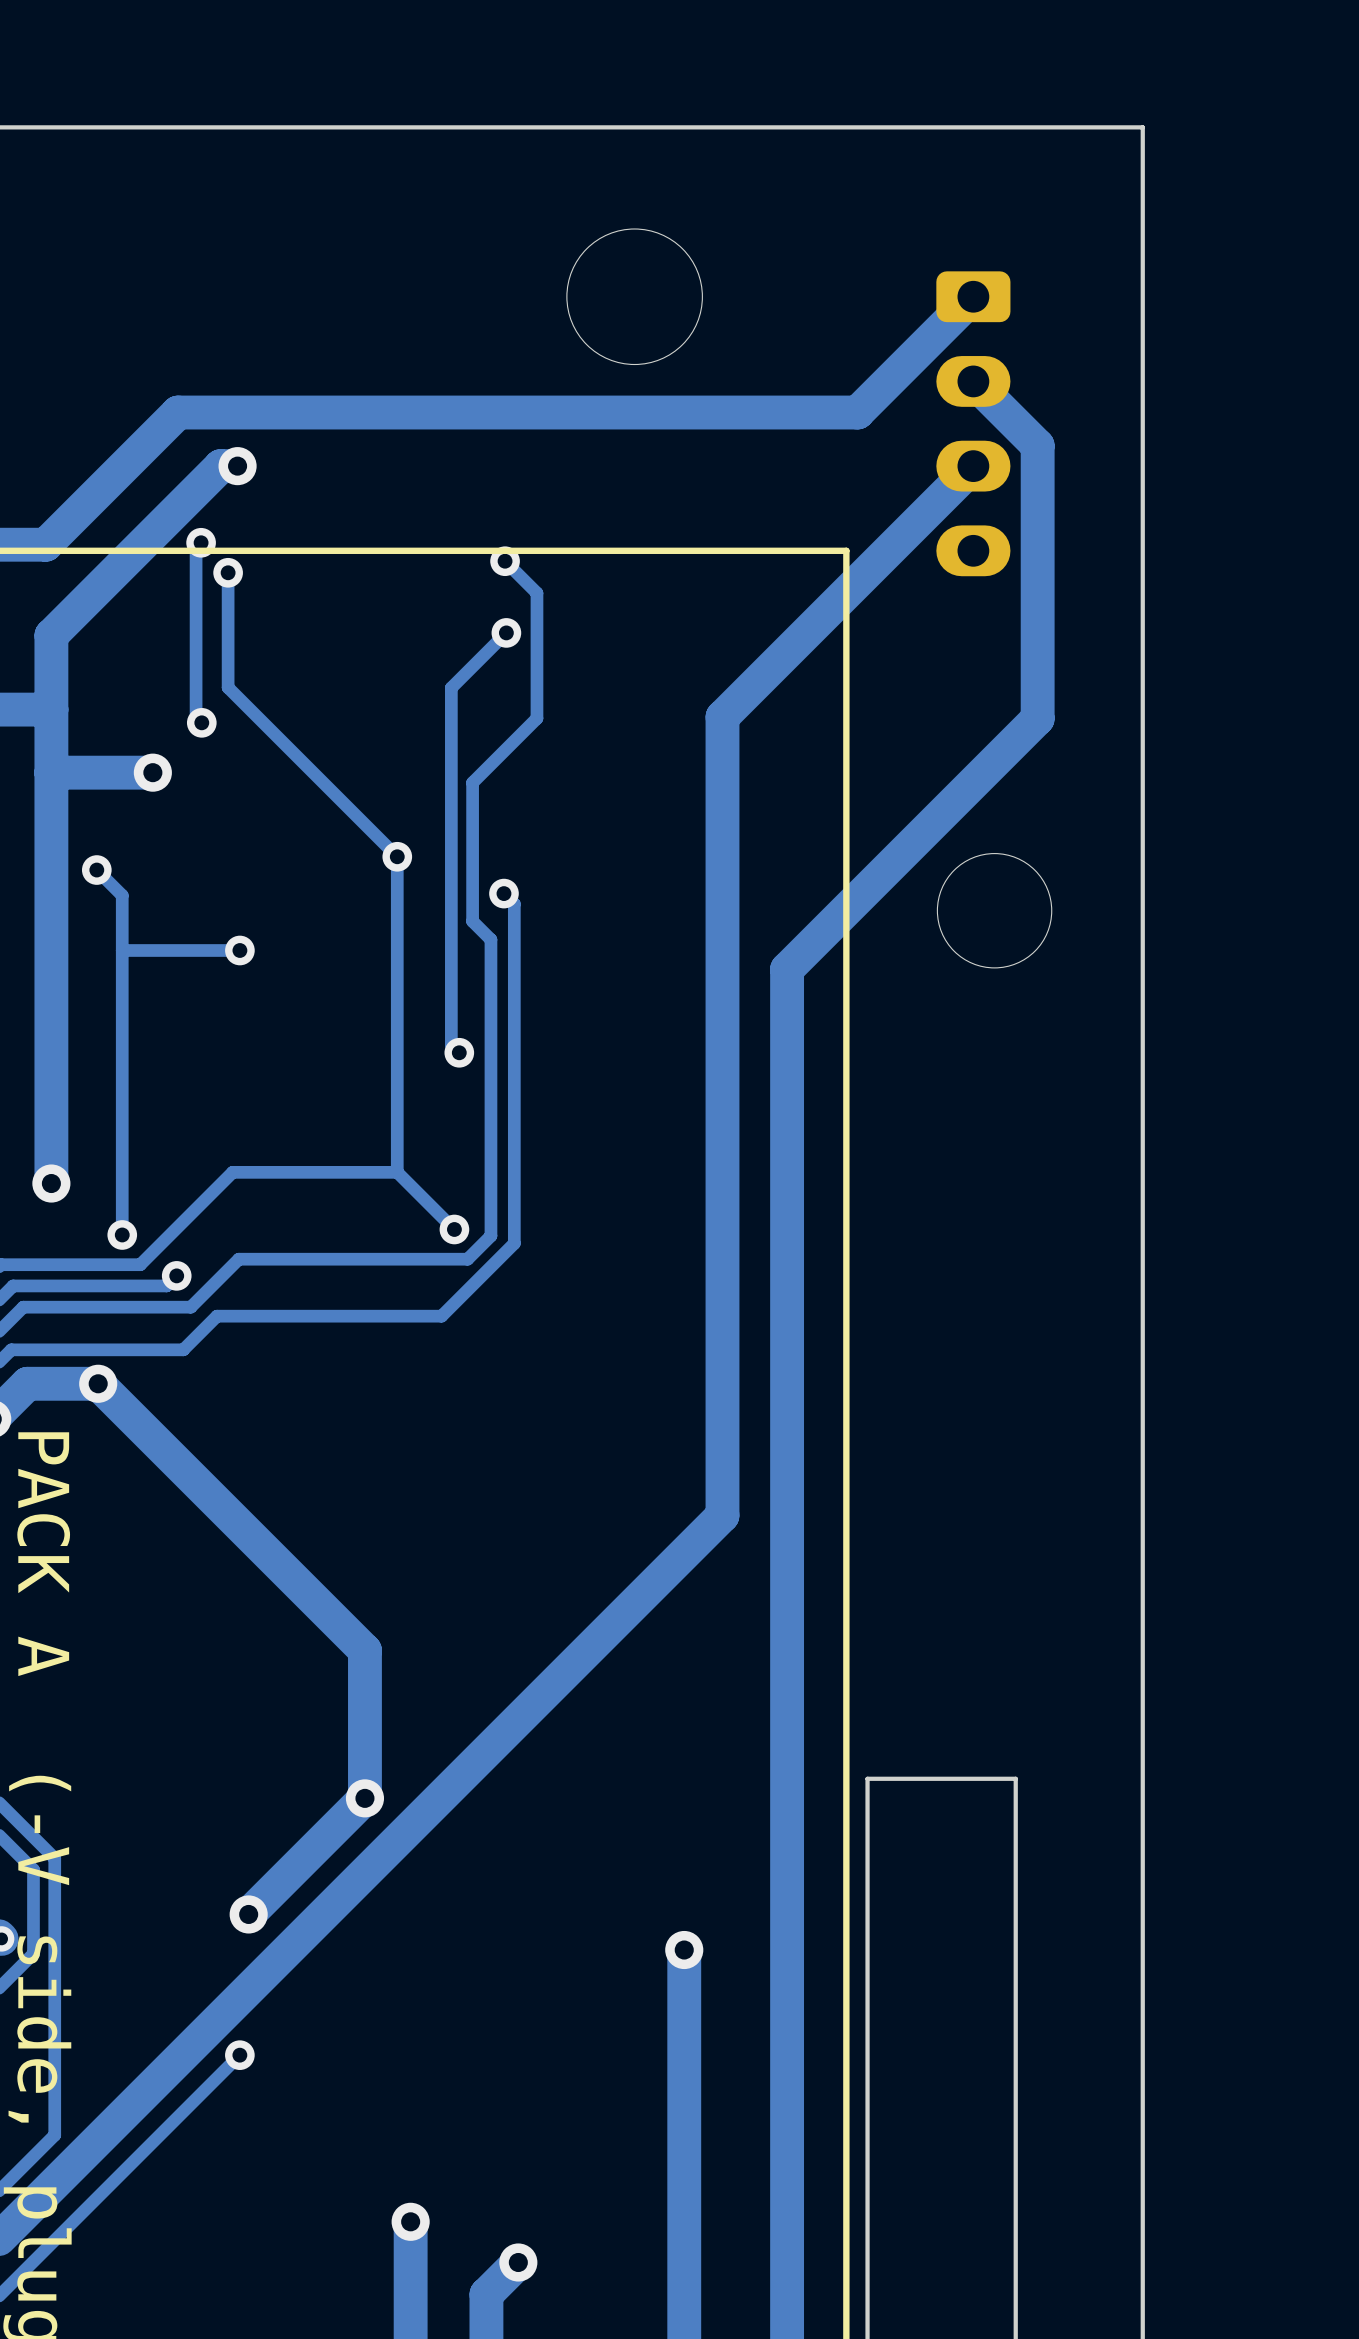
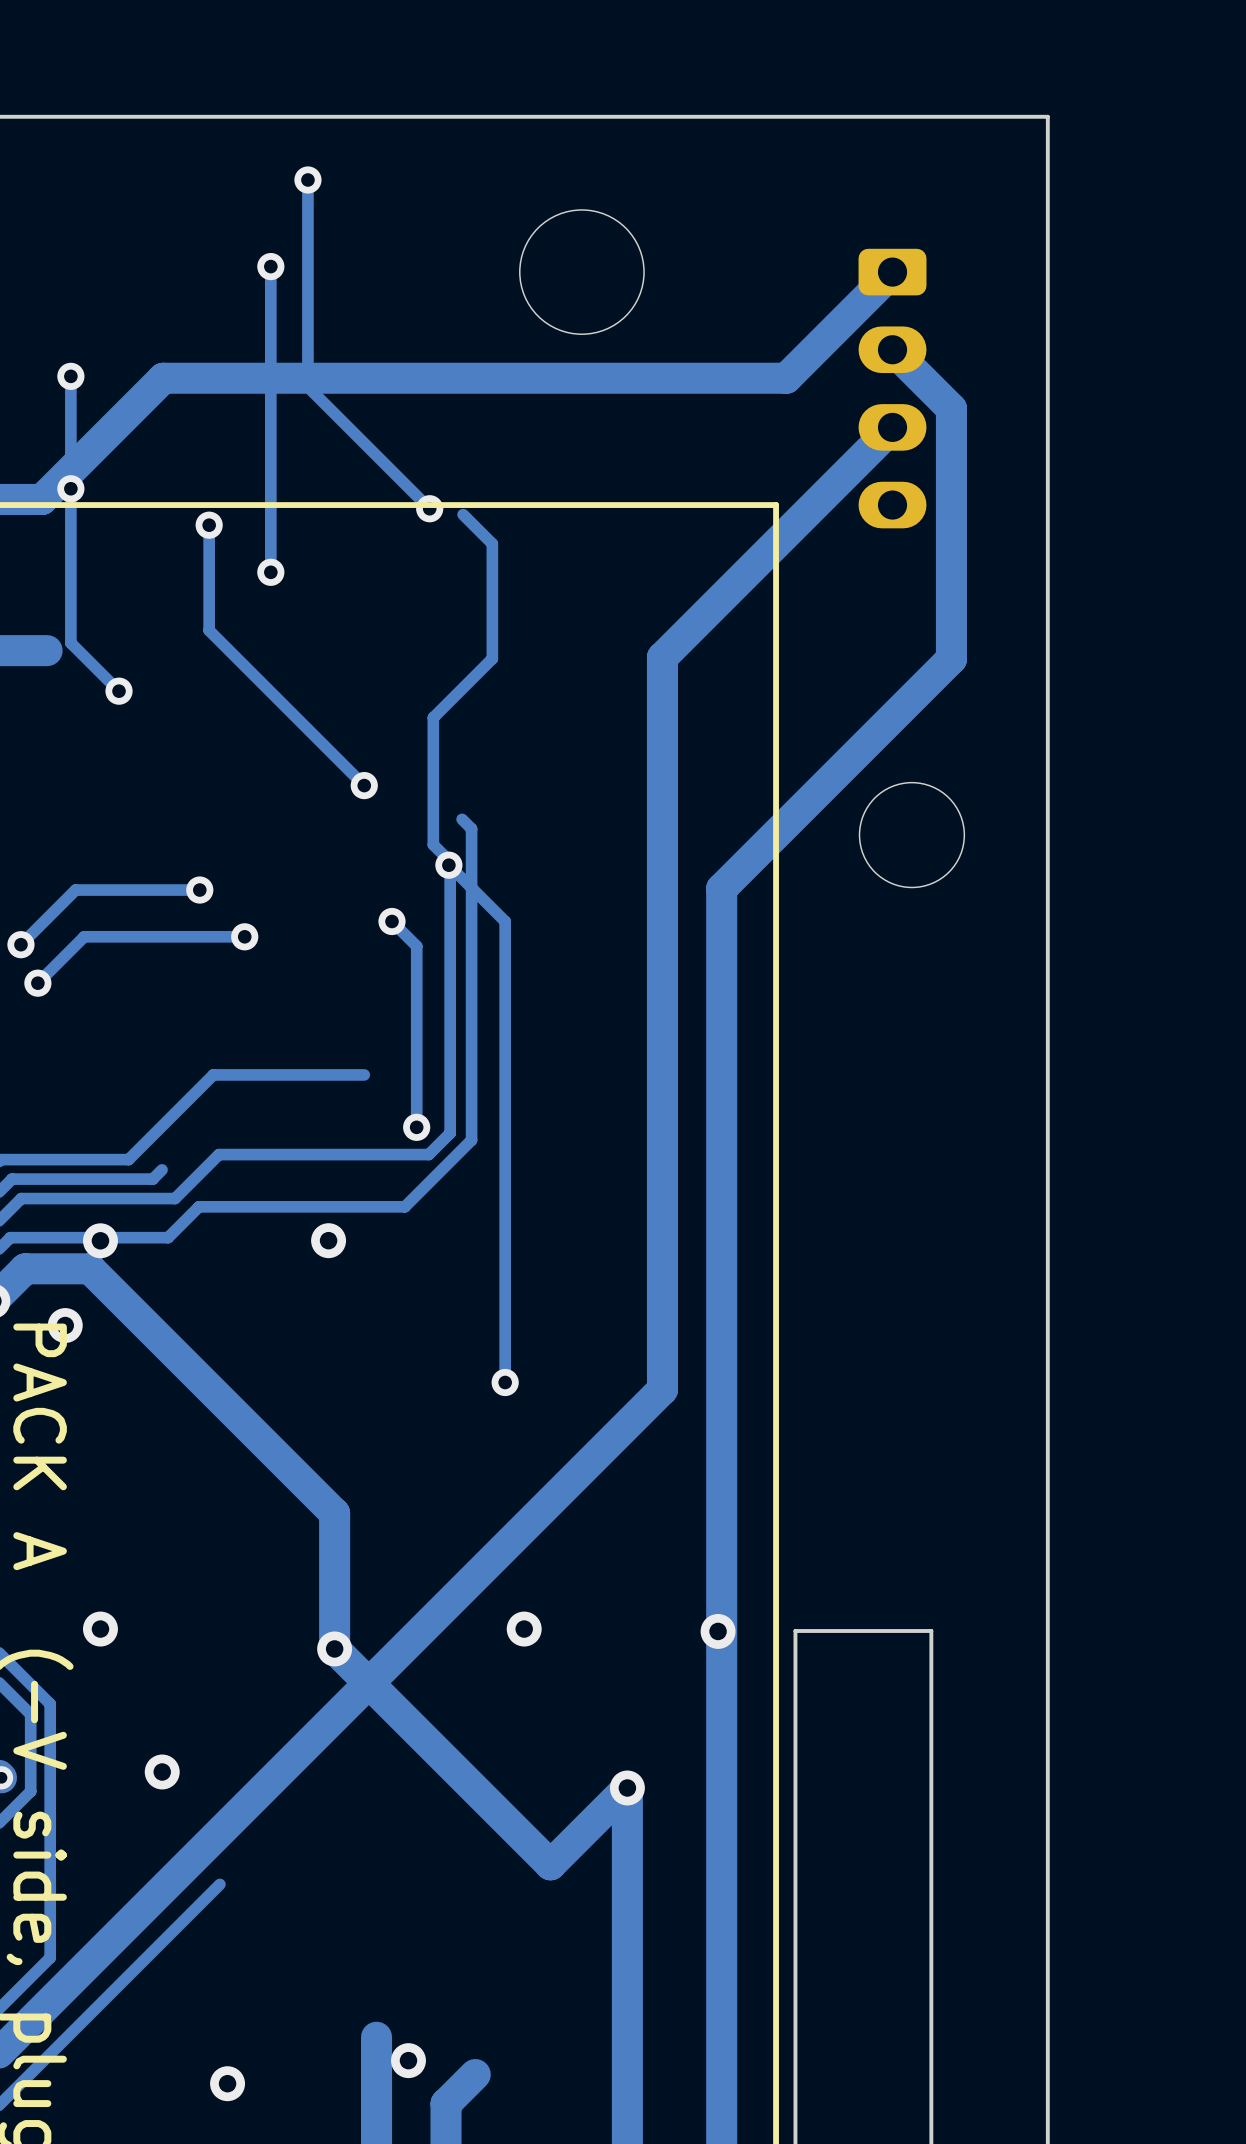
track: none -> (307, 179) (307, 386) (429, 508)
via: none -> (307, 179)
track: none -> (270, 266) (270, 572)
via: none -> (270, 266)
track: none -> (70, 376) (70, 643) (119, 691)
via: none -> (70, 376)
track: (237, 466) (220, 466) (51, 635) (51, 1183) -> none
via: (237, 466) -> none
via: none -> (70, 488)
track: (201, 542) (196, 547) (196, 717) (201, 722) -> none
via: (201, 542) -> none
via position: (505, 561) -> (429, 508)
via: none -> (270, 572)
track: (506, 632) (451, 687) (451, 1044) (459, 1052) -> none
via: (506, 632) -> none
via: (201, 722) -> none
track: (152, 772) (51, 772) -> none
via position: (152, 772) -> (119, 691)
track: (397, 856) (397, 1172) (454, 1229) -> (392, 921) (416, 946) (416, 1127)
track: (96, 870) (122, 895) (122, 1234) -> none
via: (96, 870) -> none
via position: (503, 893) -> (448, 865)
track: none -> (448, 865) (505, 921) (505, 1382)
track: (239, 950) (122, 950) -> none
via position: (239, 950) -> (199, 890)
track: none -> (199, 890) (75, 890) (20, 944)
via: none -> (392, 921)
track: none -> (244, 936) (84, 936) (37, 983)
via: none -> (244, 936)
via: none -> (20, 944)
via: (459, 1052) -> none
via: none -> (37, 983)
via: (51, 1183) -> none
via: (122, 1234) -> none
via: (176, 1275) -> none
via: none -> (328, 1240)
via position: (98, 1383) -> (100, 1240)
via: none -> (65, 1325)
via: none -> (505, 1382)
via: none -> (100, 1629)
via: none -> (524, 1629)
via: none -> (718, 1631)
track: (364, 1798) (248, 1914) -> (334, 1648) (550, 1864) (627, 1787)
via position: (248, 1914) -> (162, 1771)
via: (239, 2055) -> none
via: (410, 2221) -> none
via: none -> (408, 2060)
via: (518, 2262) -> none
via: none -> (227, 2083)

